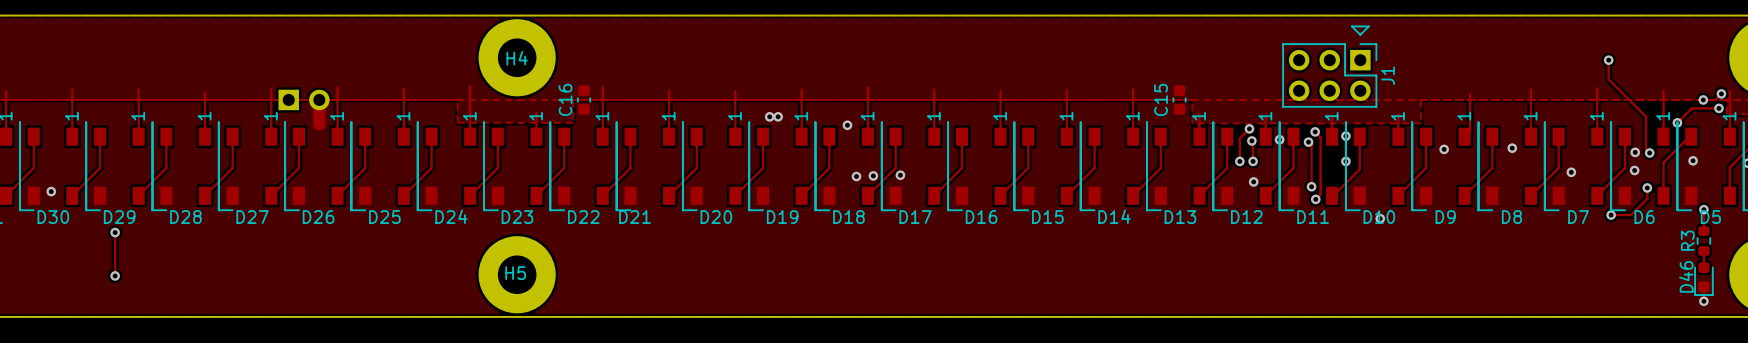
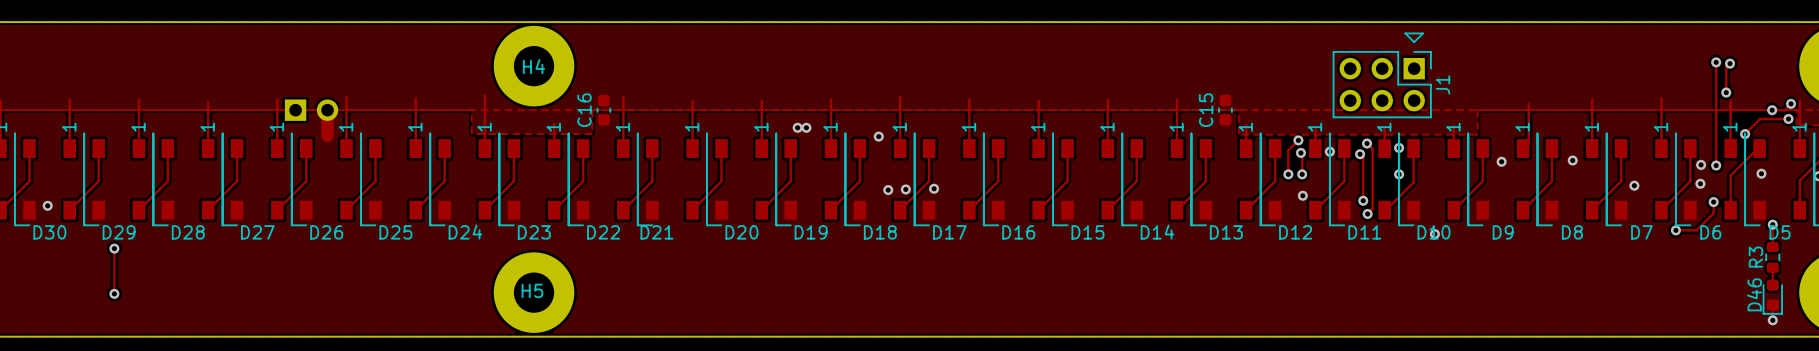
via: none -> (1716, 62)
track: none -> (1730, 63) (1726, 67) (1726, 92)
via: none -> (1730, 63)
track: (1608, 60) (1608, 79) (1646, 116) (1646, 149) (1649, 152) -> (1716, 62) (1716, 165)
via: (1608, 60) -> none
via: none -> (1726, 92)

